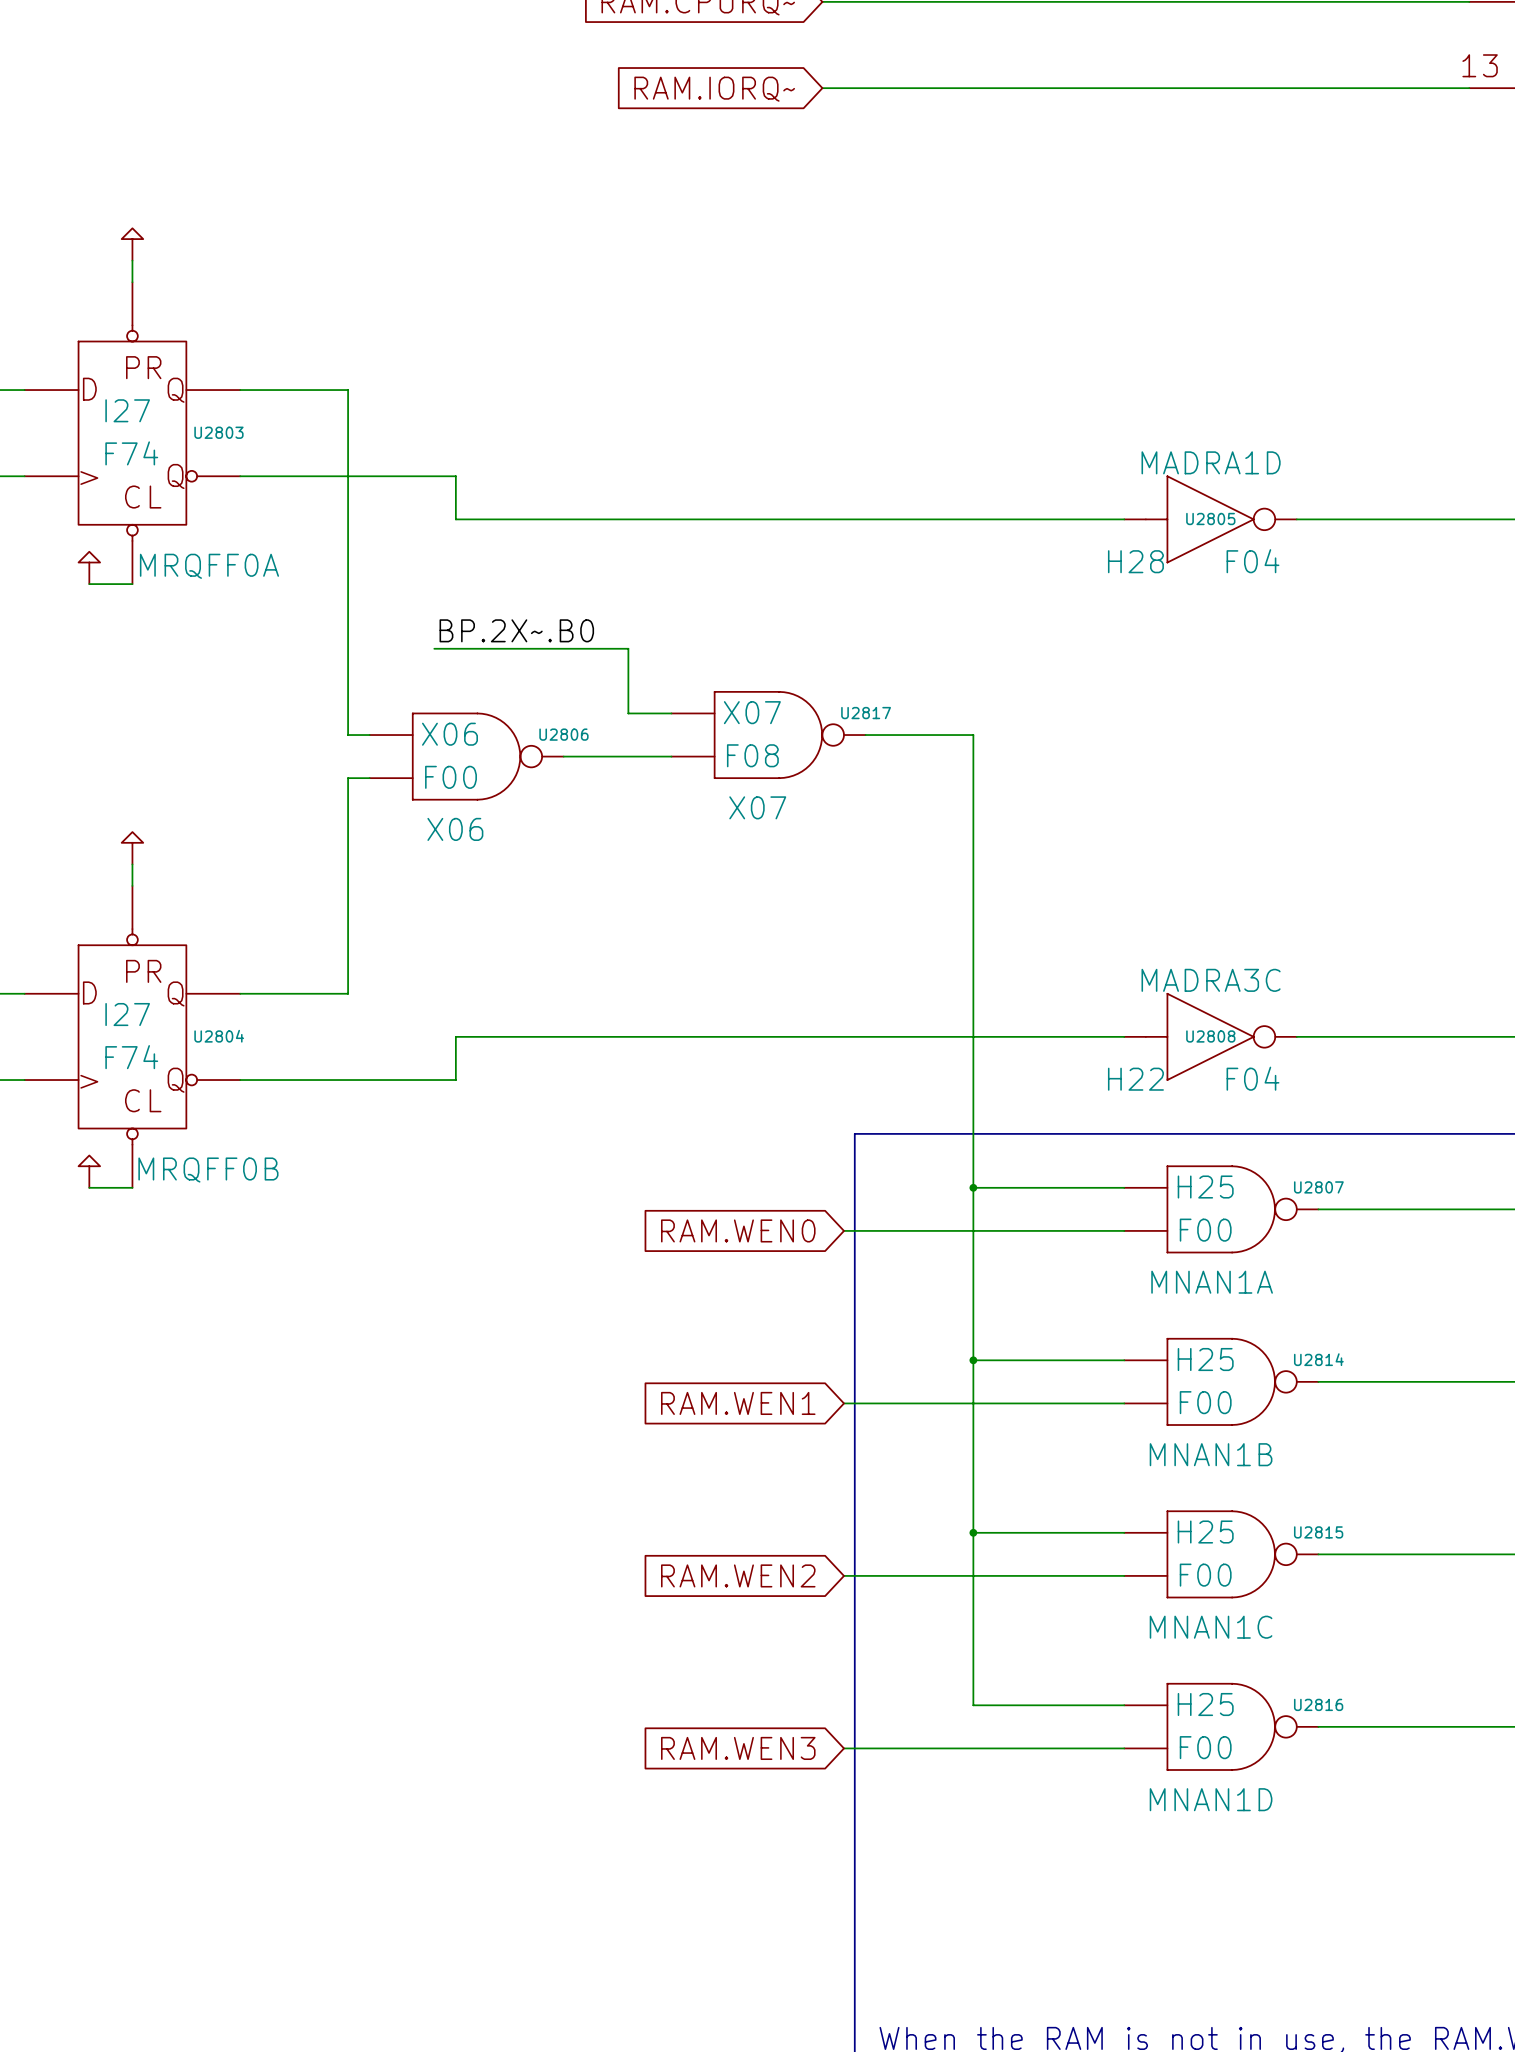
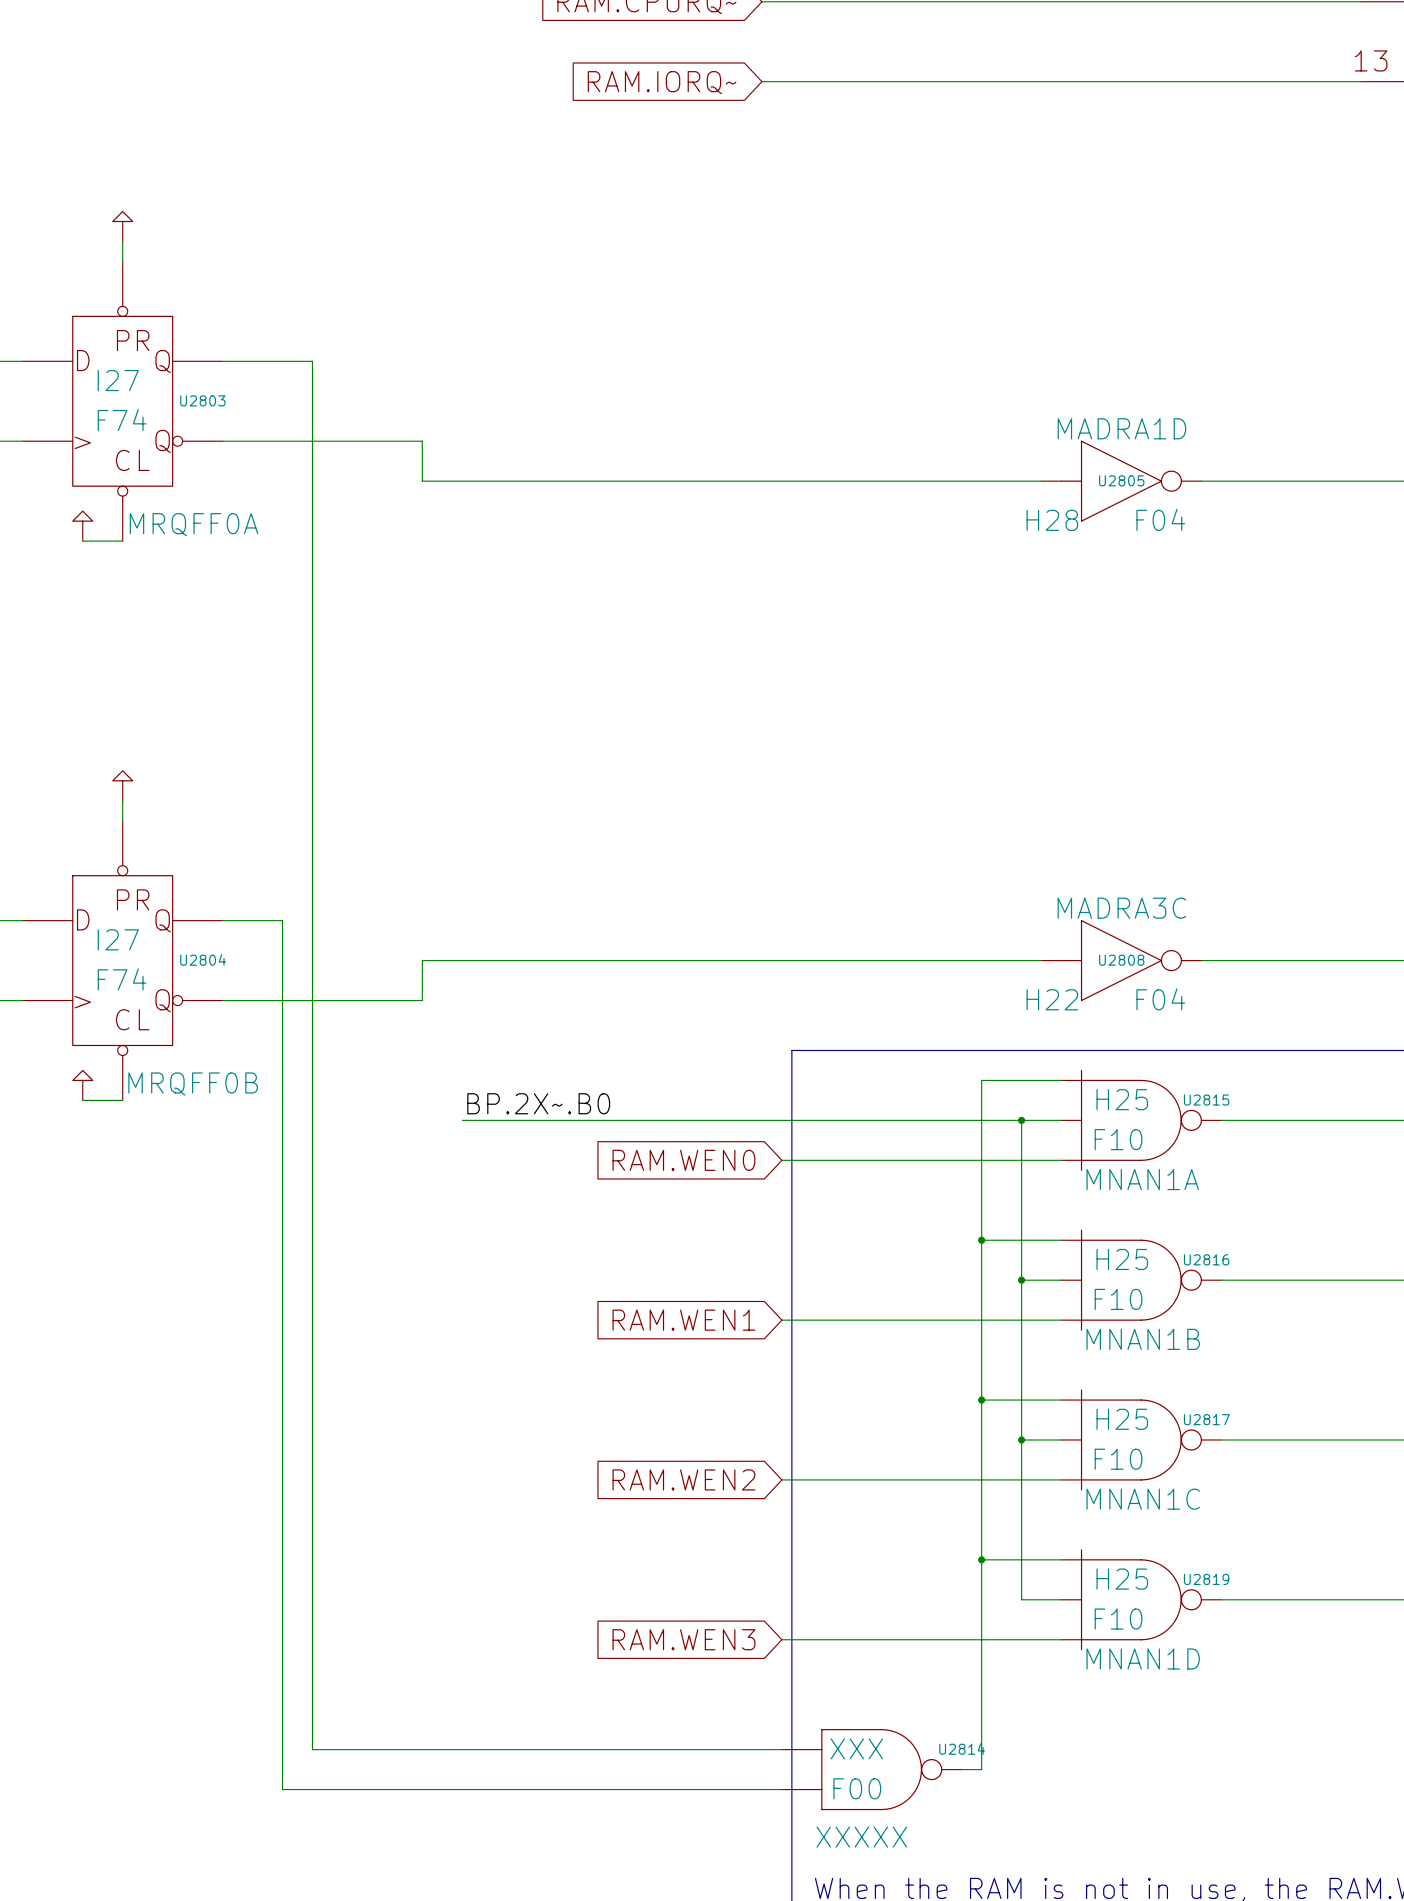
wire: (337, 390) (348, 390) (348, 735) (369, 735) -> (312, 361) (312, 1749) (781, 1749)
label: BP.2X~.B0 (516, 630) -> none
wire: (434, 648) (628, 648) (628, 713) (671, 713) -> none
U2817 symbol: [671, 691, 866, 779] -> [1061, 1389, 1222, 1491]
U2817 text: X07 (752, 712) -> H25 (1122, 1419)
U2817 name position: U2817 (866, 713) -> U2817 (1206, 1419)
wire: (865, 735) (973, 735) (973, 1705) (1124, 1705) -> none
U2817 value: F08 (752, 755) -> F10 (1118, 1459)
U2806: F00 (466, 756) -> none
wire: (563, 756) (671, 756) -> none
wire: (369, 778) (348, 778) (348, 993) (304, 993) -> (781, 1789) (282, 1789) (282, 920)
U2817 text: X07 (757, 807) -> MNAN1C (1143, 1499)
wire: none -> (1061, 1080) (981, 1080) (981, 1769) (961, 1769)
wire: (973, 1187) (1124, 1187) -> none
junction: (973, 1187) -> none
label: none -> BP.2X~.B0 (538, 1103)
wire: none -> (462, 1120) (1061, 1120)
wire: none -> (1021, 1120) (1021, 1599) (1061, 1599)
junction: none -> (1021, 1120)
U2807: F00 (1221, 1209) -> none
global label position: RAM.WEN0 (738, 1230) -> RAM.WEN0 (683, 1160)
wire: (844, 1230) (1124, 1230) -> none
wire: none -> (781, 1160) (1061, 1160)
wire: none -> (981, 1240) (1061, 1240)
junction: none -> (981, 1240)
U2814 text: H25 (1205, 1359) -> XXX (856, 1748)
wire: (973, 1360) (1124, 1360) -> none
junction: (973, 1360) -> none
wire: none -> (1021, 1280) (1061, 1280)
junction: none -> (1021, 1280)
U2814 position: (1221, 1381) -> (871, 1769)
global label position: RAM.WEN1 (738, 1403) -> RAM.WEN1 (683, 1320)
wire: (844, 1403) (1124, 1403) -> none
wire: none -> (781, 1320) (1061, 1320)
U2814 text: MNAN1B (1211, 1454) -> XXXXX (861, 1837)
U2815 symbol: [1124, 1510, 1319, 1599] -> [1061, 1069, 1222, 1171]
wire: none -> (981, 1400) (1061, 1400)
junction: none -> (981, 1400)
wire: (973, 1532) (1124, 1532) -> none
junction: (973, 1532) -> none
U2815 name position: U2815 (1318, 1532) -> U2815 (1206, 1100)
wire: none -> (1021, 1439) (1061, 1439)
junction: none -> (1021, 1439)
global label position: RAM.WEN2 (738, 1575) -> RAM.WEN2 (683, 1479)
wire: (844, 1575) (1124, 1575) -> none
U2815 value: F00 (1205, 1575) -> F10 (1118, 1139)
wire: none -> (781, 1479) (1061, 1479)
U2815 text: MNAN1C (1211, 1627) -> MNAN1A (1142, 1179)
wire: none -> (981, 1559) (1061, 1559)
junction: none -> (981, 1559)
U2816 symbol: [1124, 1683, 1319, 1771] -> [1061, 1229, 1222, 1331]
U2816 name position: U2816 (1318, 1704) -> U2816 (1206, 1259)
U2819: none -> F10 (1141, 1599)
U2816 value: F00 (1205, 1747) -> F10 (1118, 1299)
global label position: RAM.WEN3 (738, 1748) -> RAM.WEN3 (683, 1639)
wire: (844, 1748) (1124, 1748) -> none
wire: none -> (781, 1639) (1061, 1639)
U2816 text: MNAN1D (1211, 1799) -> MNAN1B (1143, 1339)

